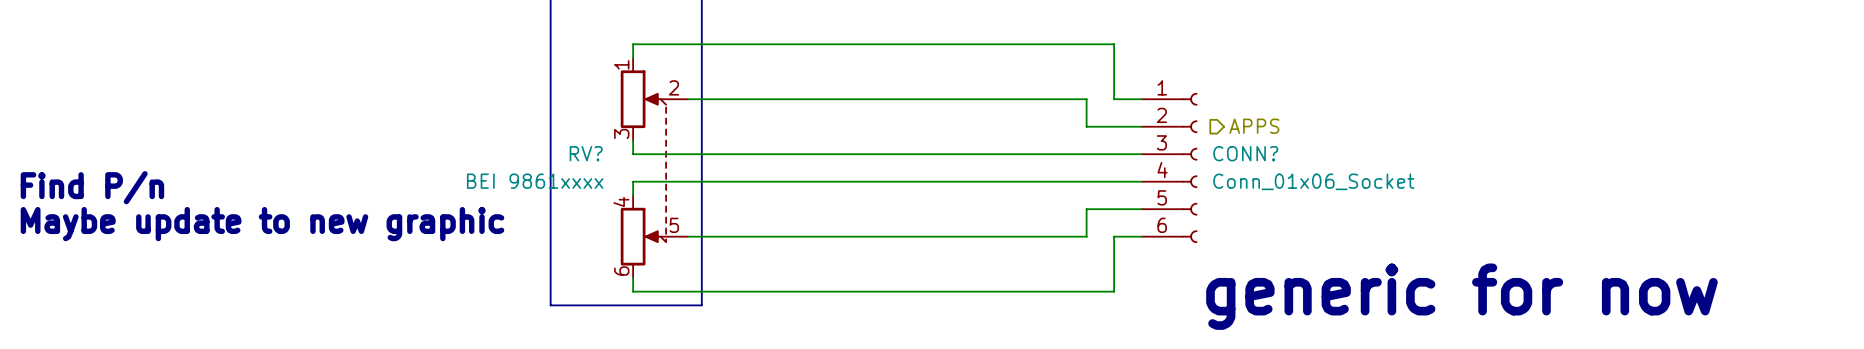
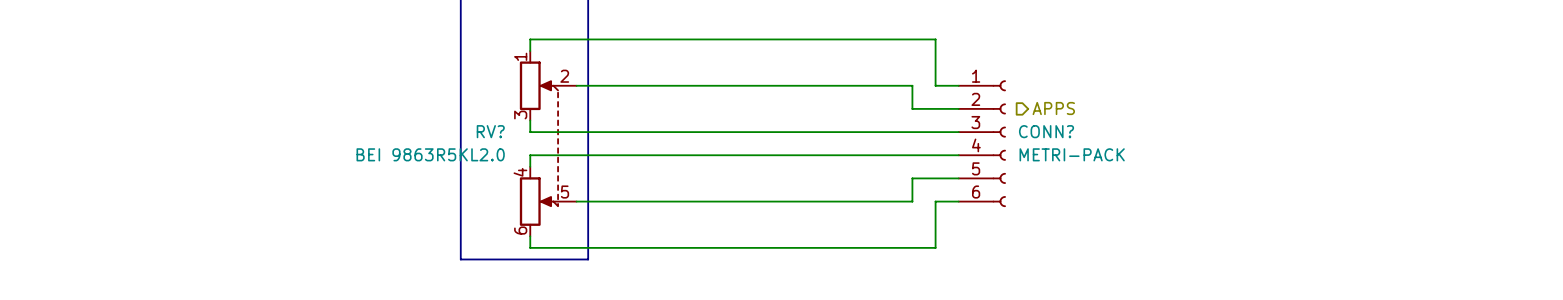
RV? value: BEI 9861xxxx (535, 181) -> BEI 9863R5KL2.0 (430, 154)
CONN? value: Conn_01x06_Socket (1313, 181) -> METRI-PACK (1072, 154)
text: Find P/n (92, 187) -> none
text: Maybe update to new graphic (262, 224) -> none
text: generic for now (1461, 296) -> none

